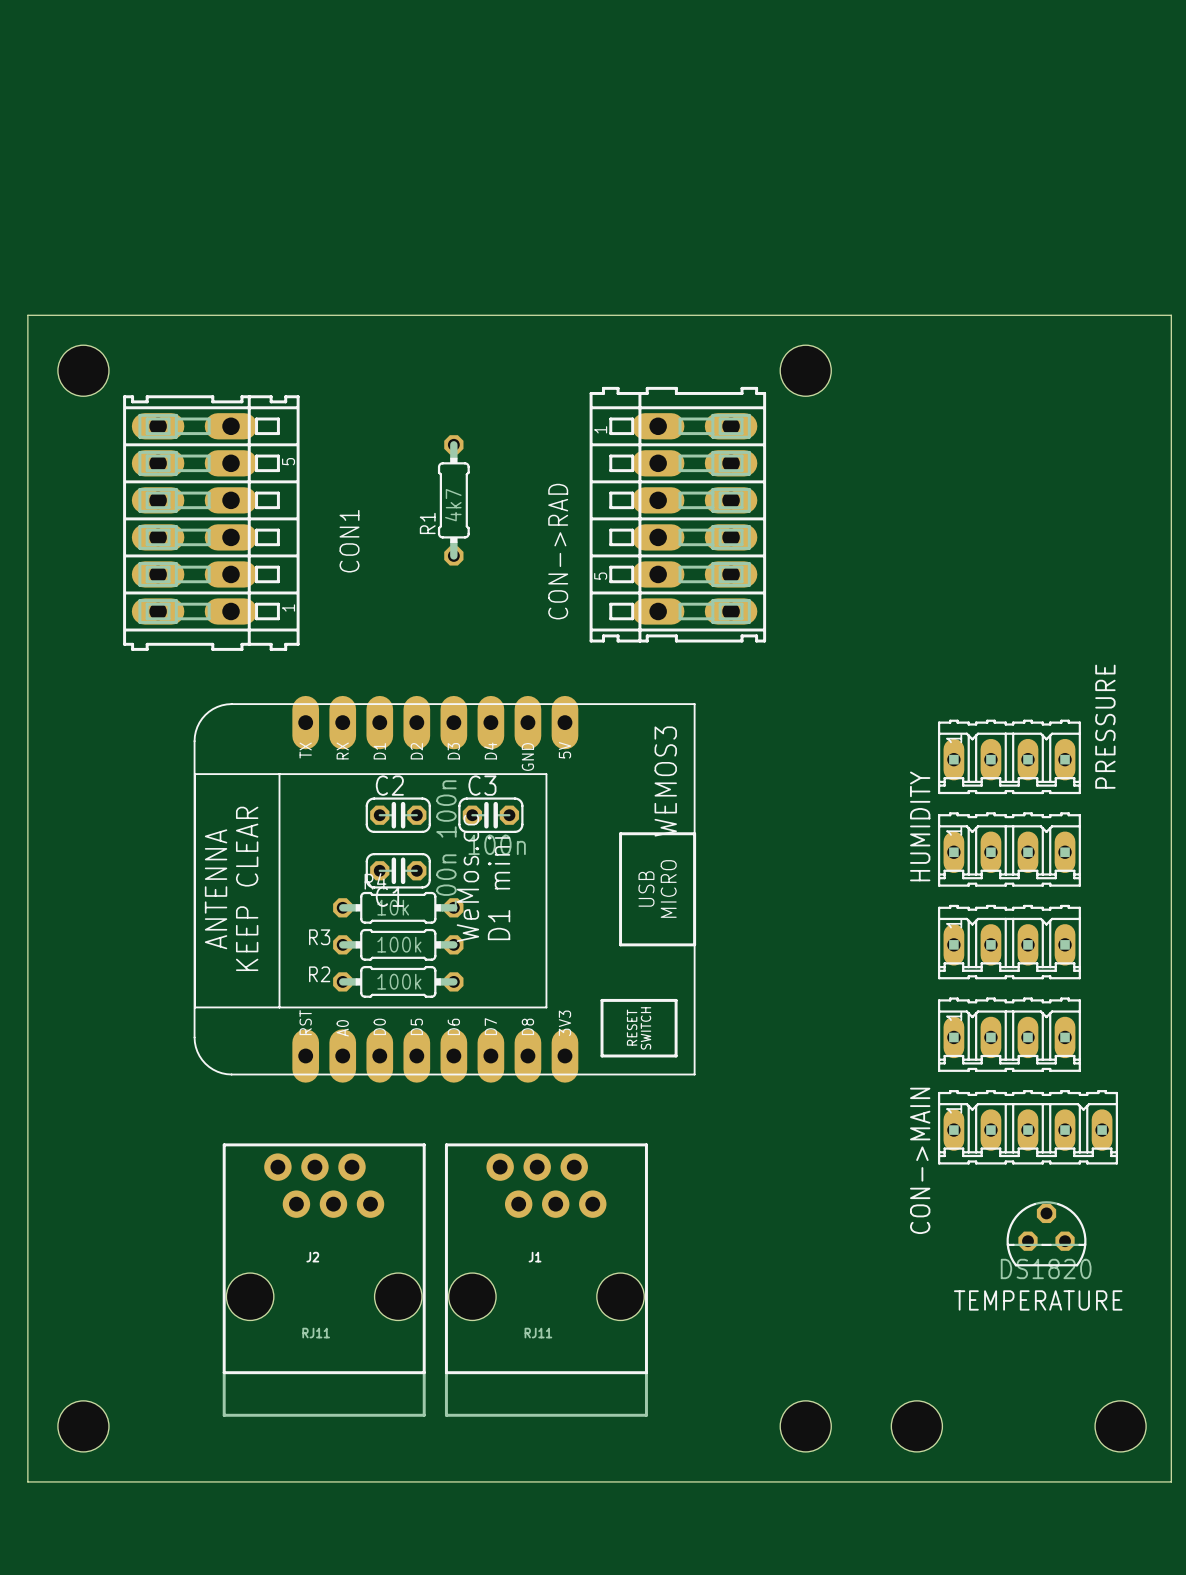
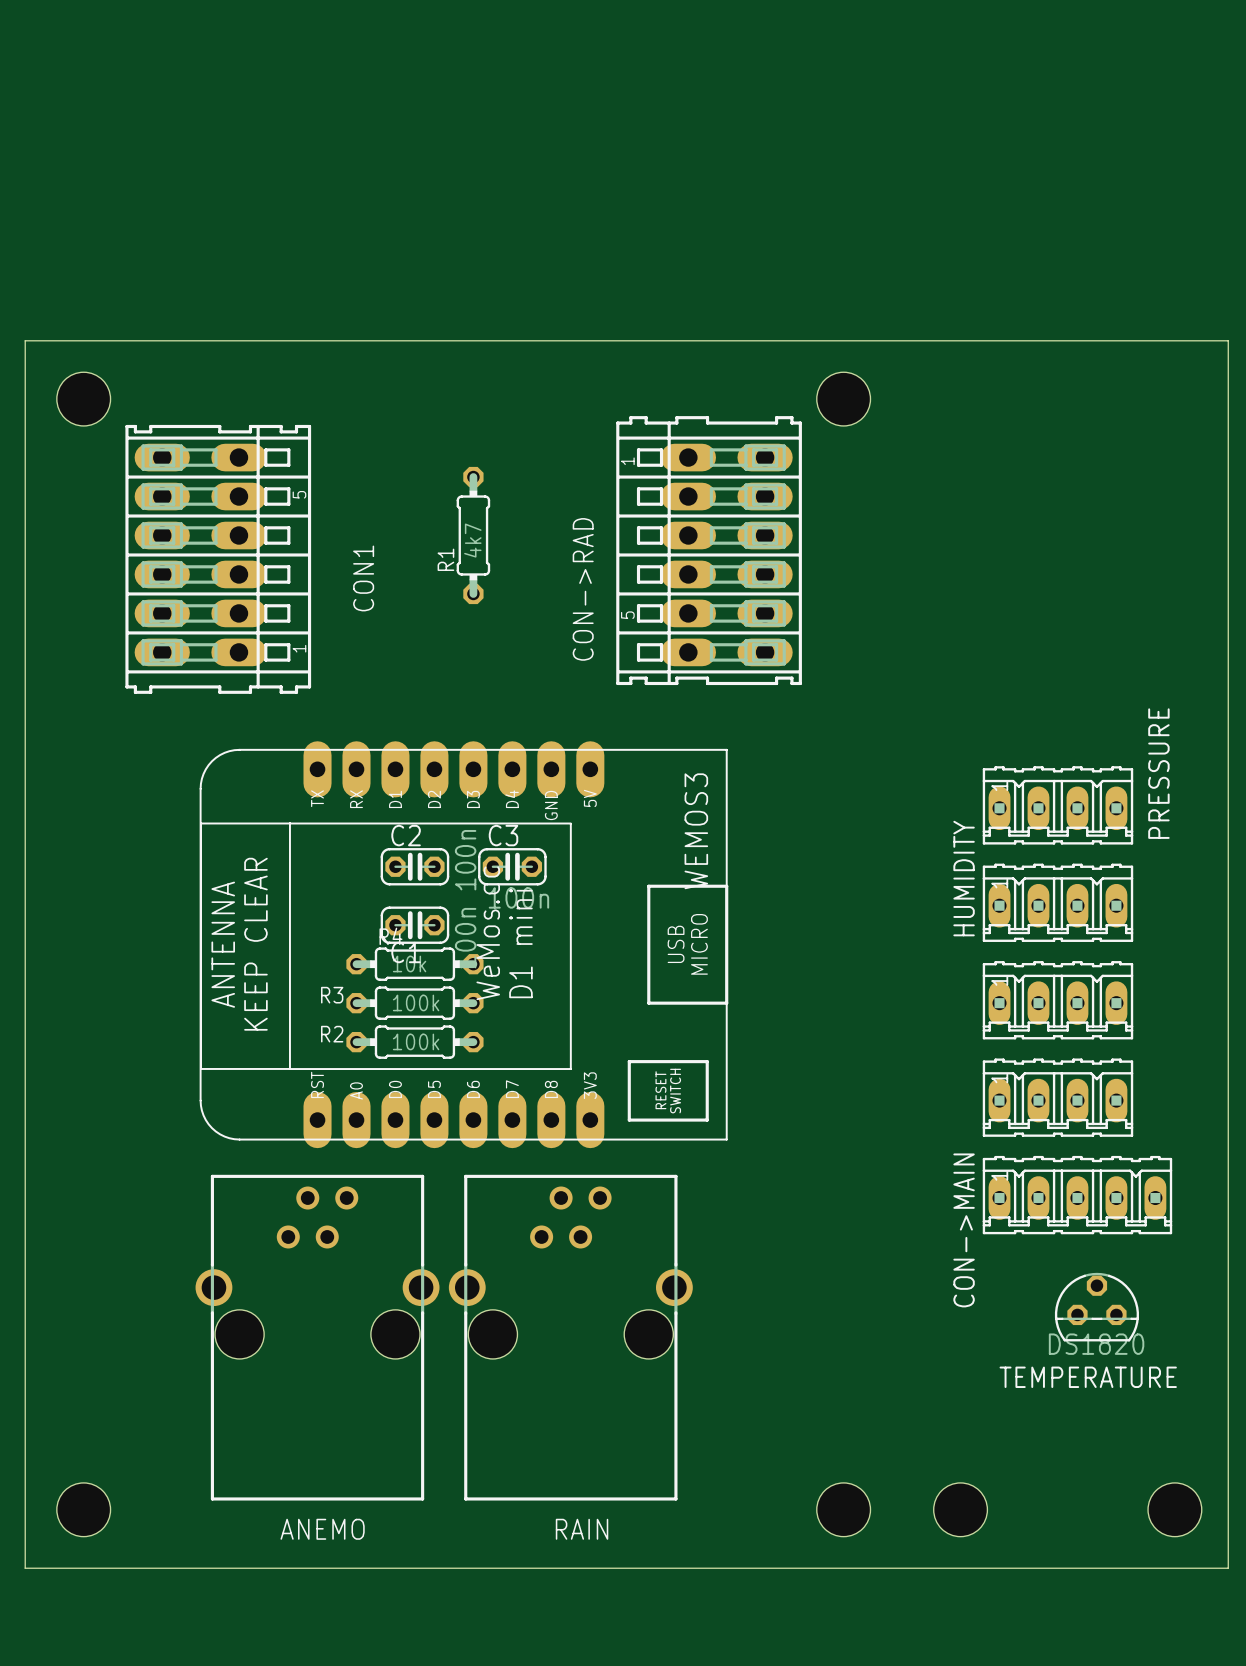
ANEMO: none -> (317, 1337)
RAIN: none -> (570, 1337)
J2: RJ11 (324, 1280) -> none
J1: RJ11 (546, 1280) -> none

